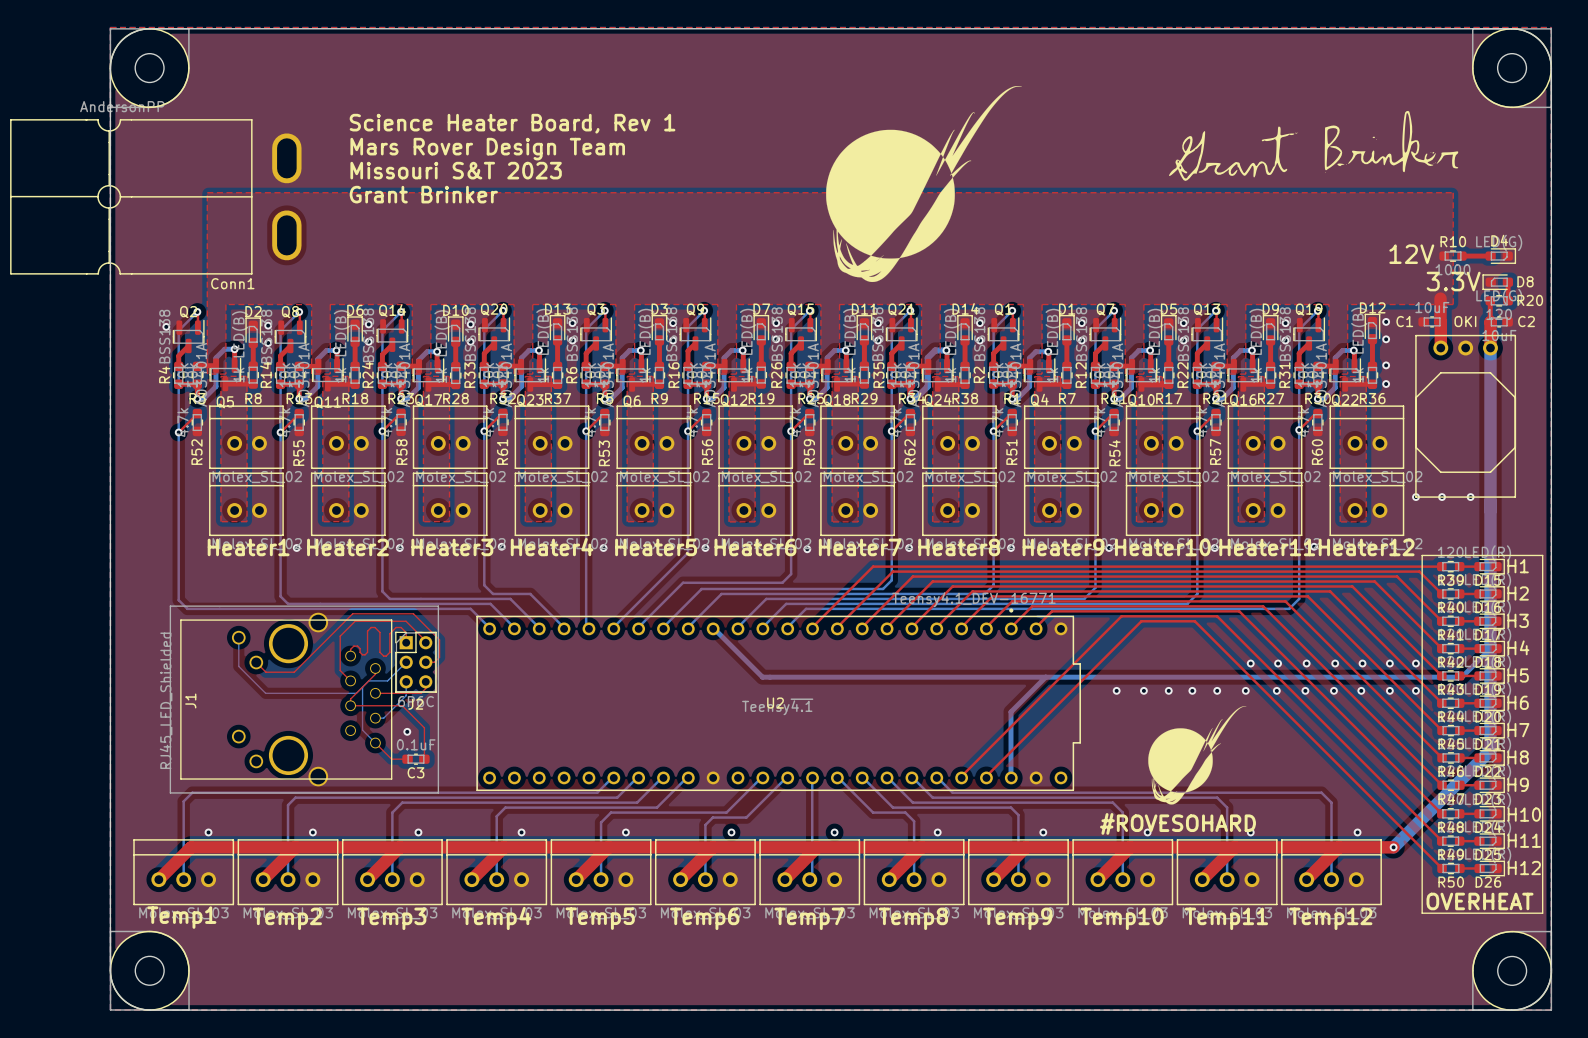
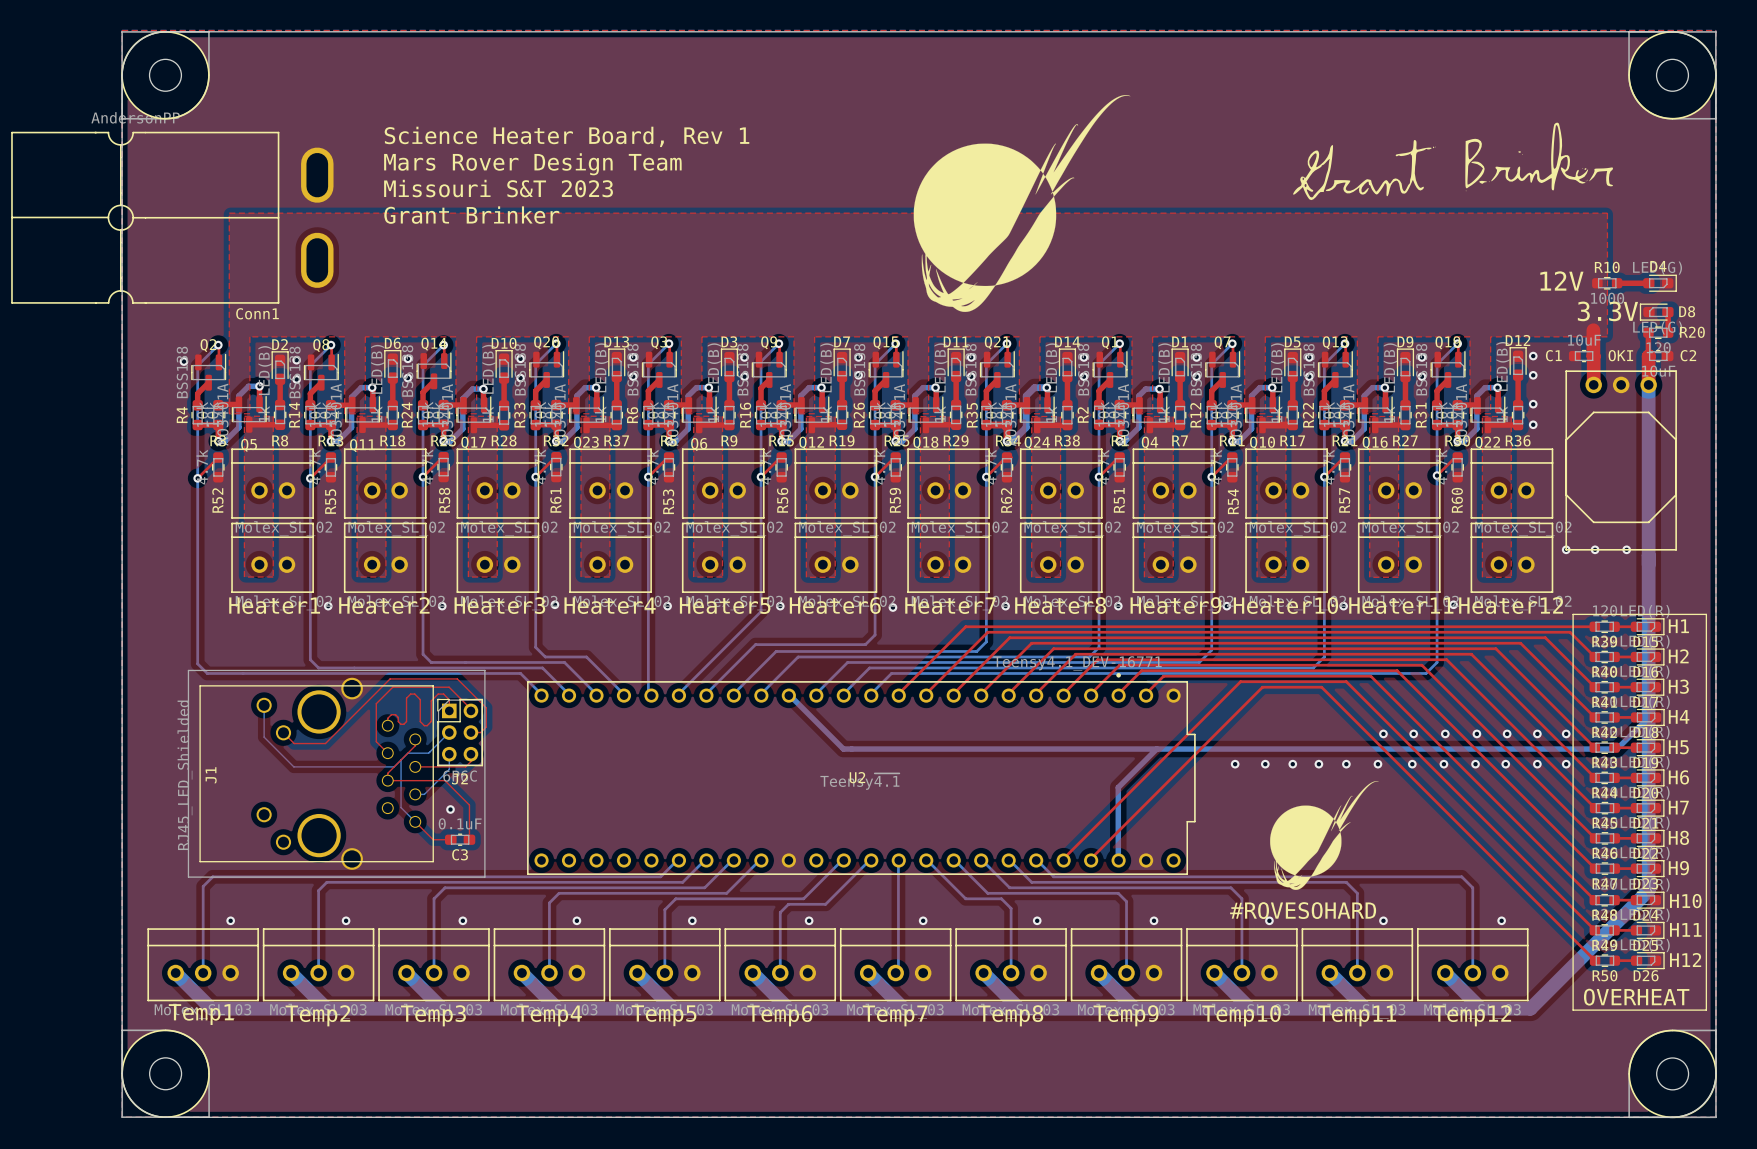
bottom track: (1490, 750) (1393, 847) -> (1648, 830) (1648, 890) (1530, 1008) (211, 1008) (175, 973)
top track: (295, 847) (263, 879) -> none
top track: (399, 847) (367, 879) -> none
top track: (504, 847) (471, 879) -> none
top track: (608, 847) (576, 879) -> none
top track: (712, 847) (680, 879) -> none
top track: (817, 847) (784, 879) -> none
top track: (921, 847) (889, 879) -> none
top track: (1025, 847) (993, 879) -> none
top track: (1130, 847) (1097, 879) -> none
top track: (1234, 847) (1202, 879) -> none
top track: (1338, 847) (1306, 879) -> none
top track: (1393, 847) (191, 847) (158, 879) -> none
via: (1393, 847) -> none
bottom track: none -> (291, 973) (326, 1008)
bottom track: none -> (406, 973) (442, 1008)
bottom track: none -> (521, 973) (557, 1008)
bottom track: none -> (637, 973) (673, 1008)
bottom track: none -> (752, 973) (788, 1008)
bottom track: none -> (868, 973) (903, 1008)
bottom track: none -> (983, 973) (1019, 1008)
bottom track: none -> (1099, 973) (1134, 1008)
bottom track: none -> (1214, 973) (1250, 1008)
bottom track: none -> (1329, 973) (1365, 1008)
bottom track: none -> (1445, 973) (1481, 1008)

